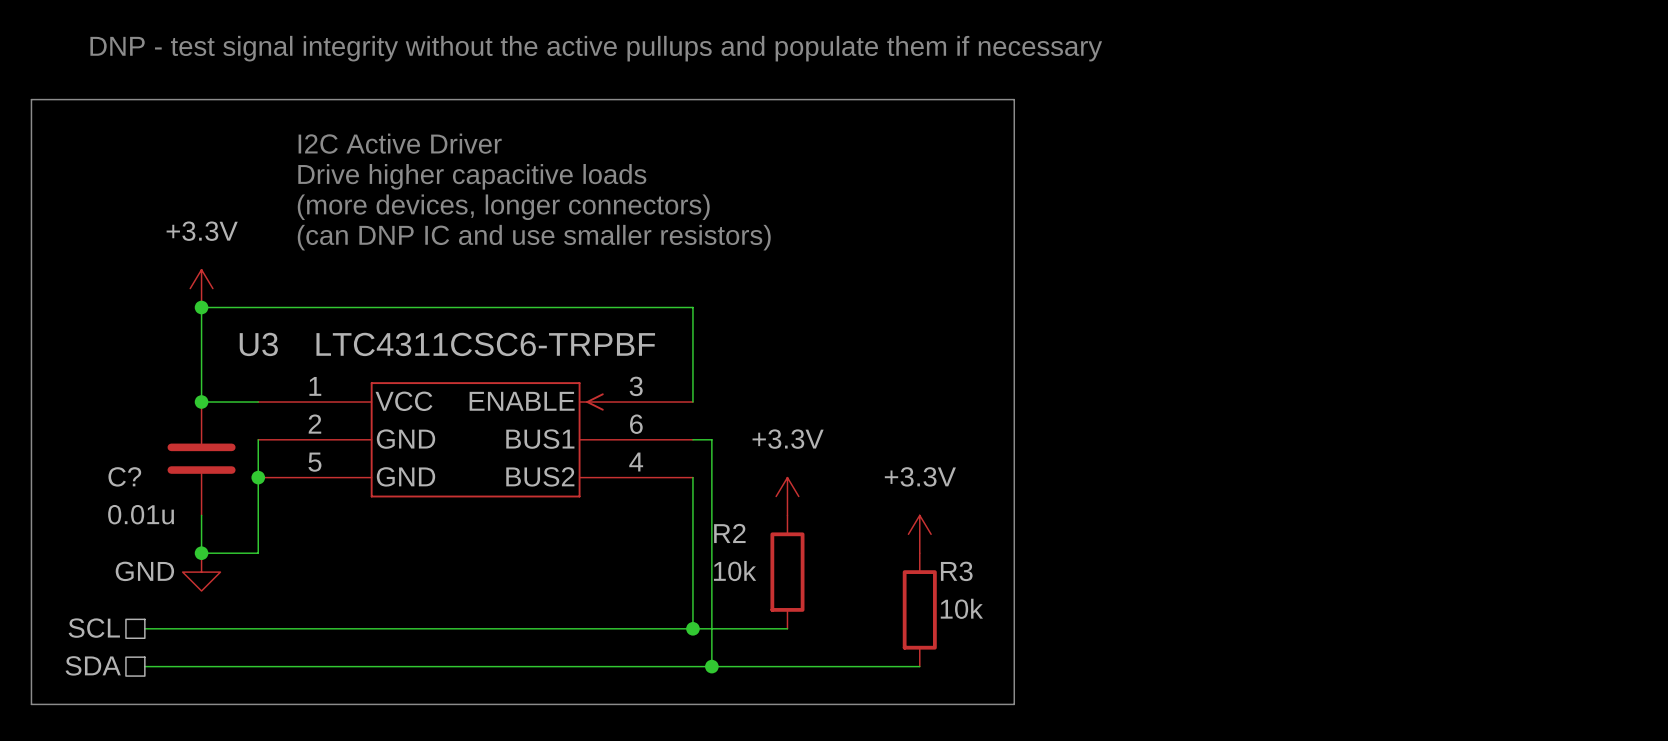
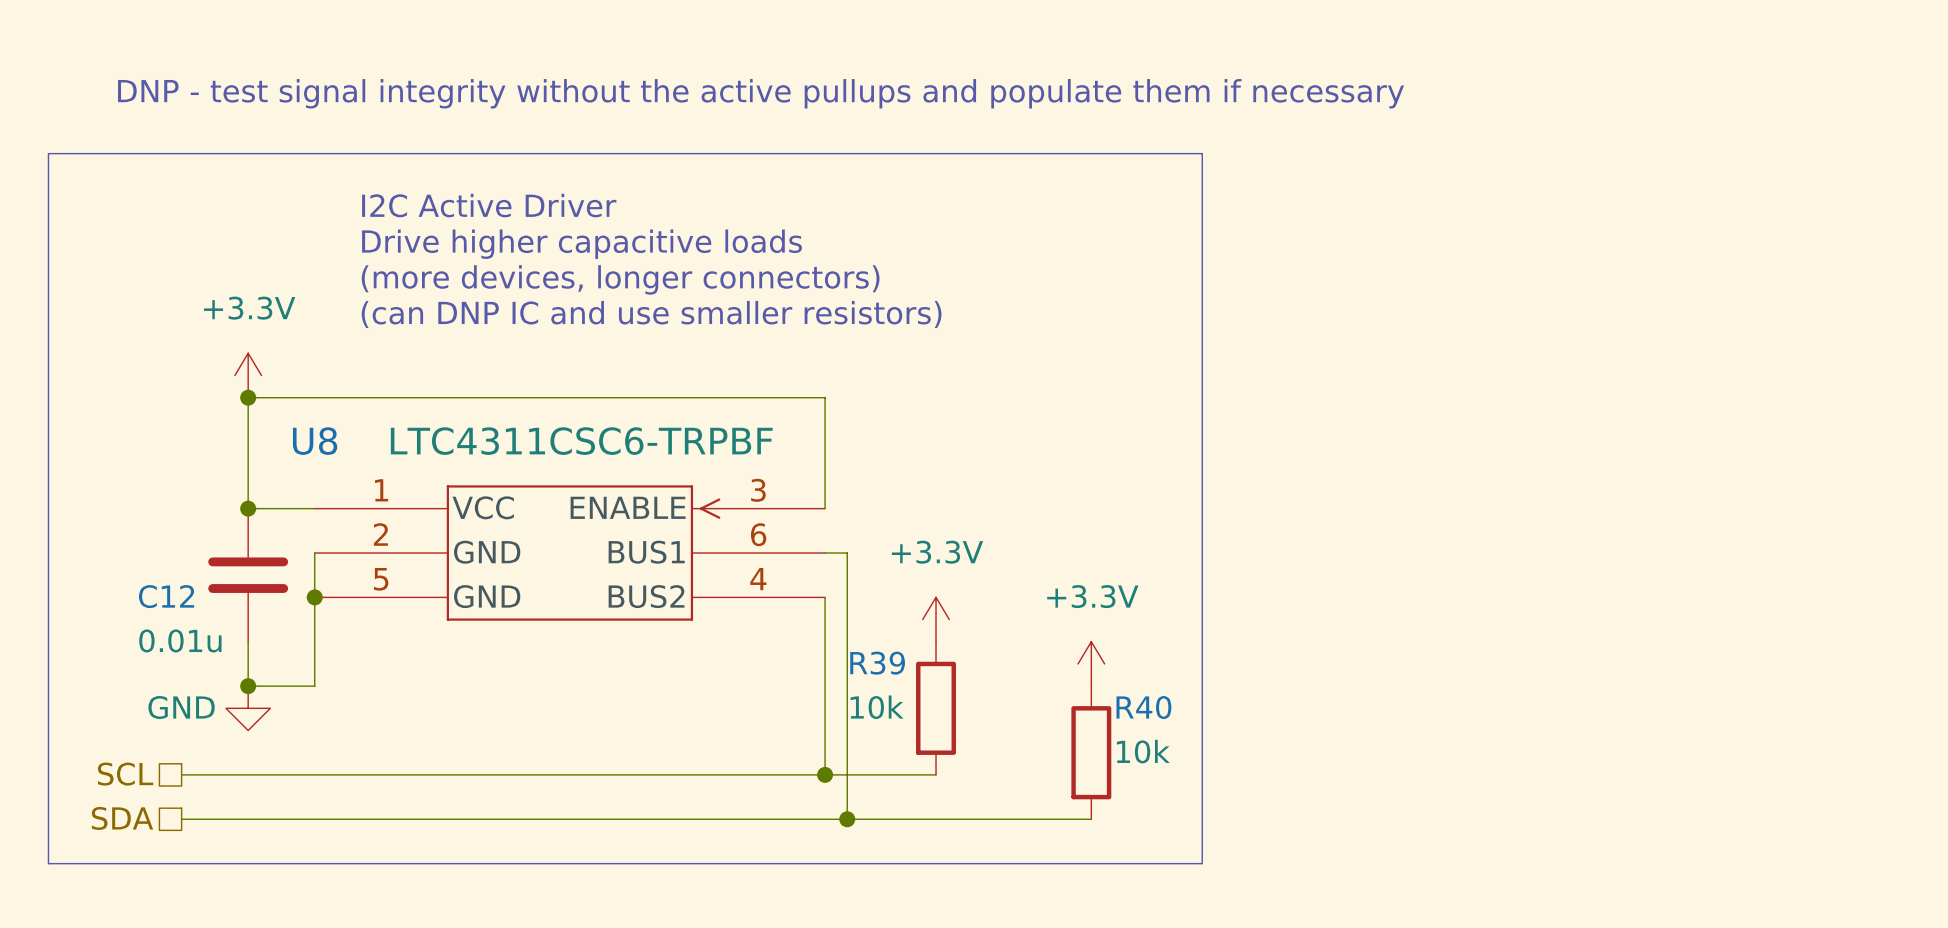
U3 name: U3 (258, 344) -> U8 (315, 441)
C? name: C? (124, 476) -> C12 (166, 596)
R2 name: R2 (729, 533) -> R39 (877, 663)
R3 name: R3 (956, 571) -> R40 (1143, 707)

